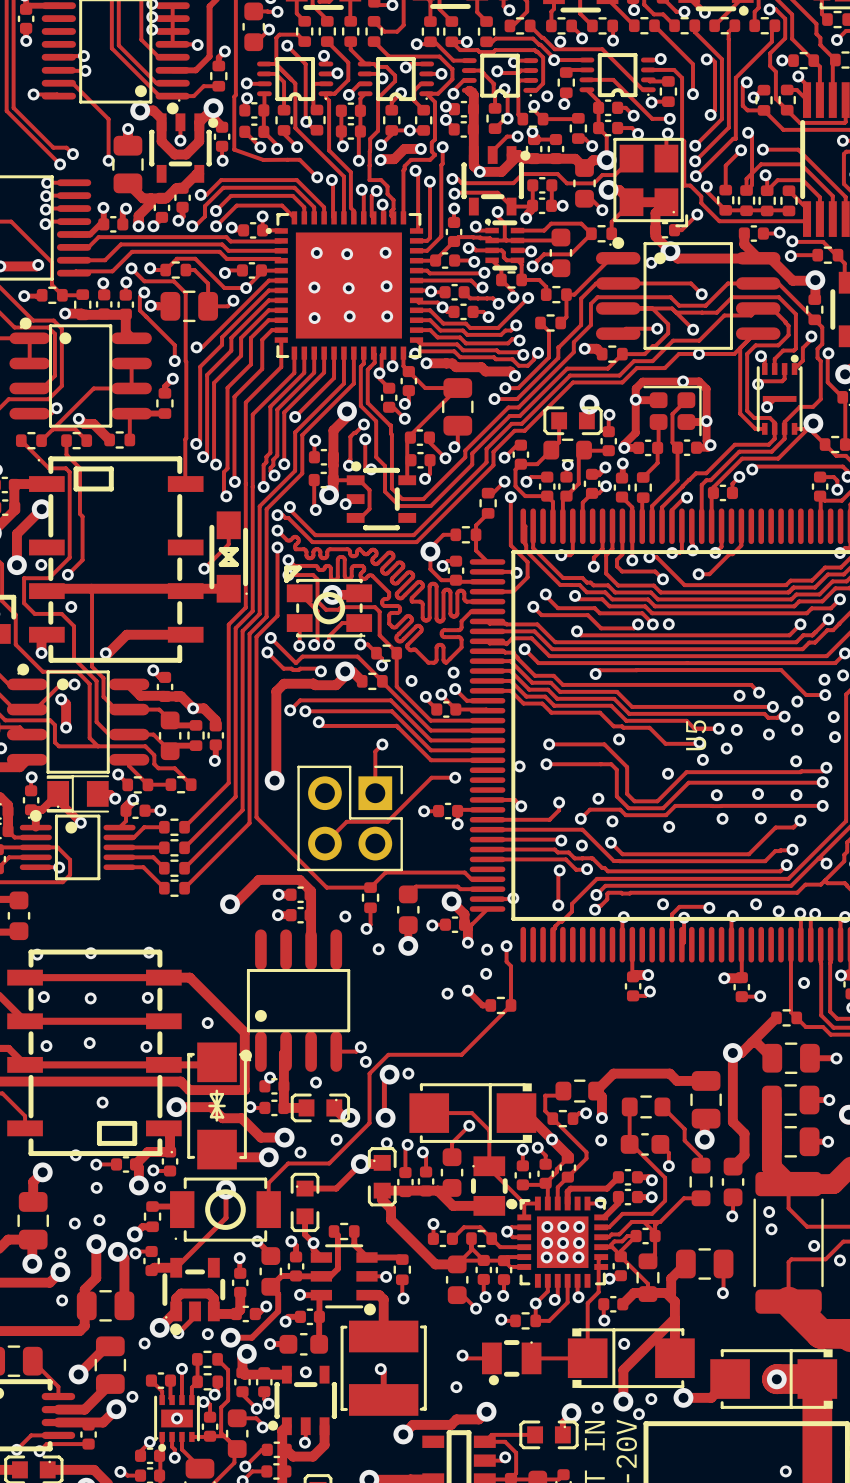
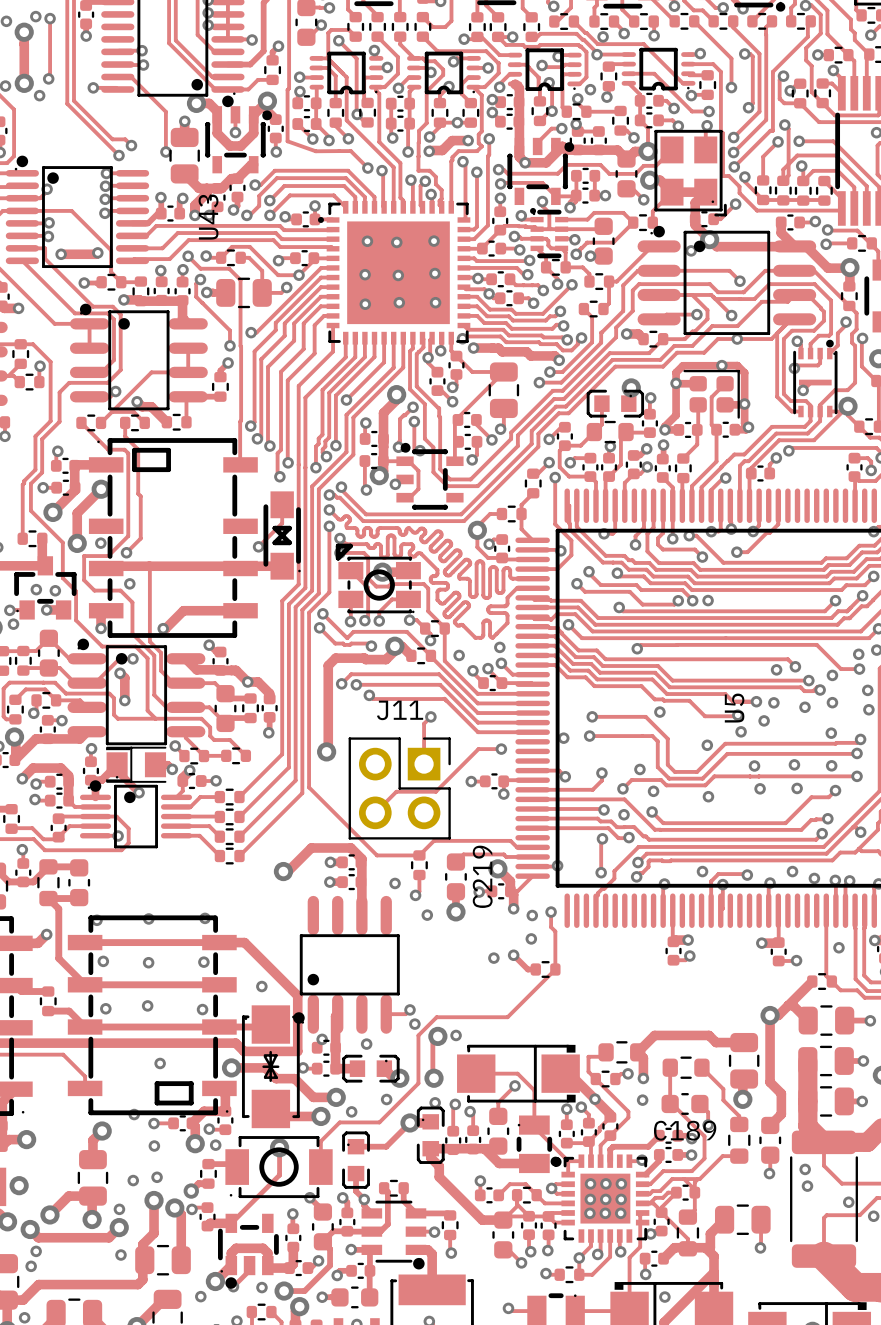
U43 name: none -> U43 (208, 217)
J11 name: none -> J11 (400, 710)
C219 name: none -> C219 (482, 876)
C189 name: none -> C189 (685, 1130)

